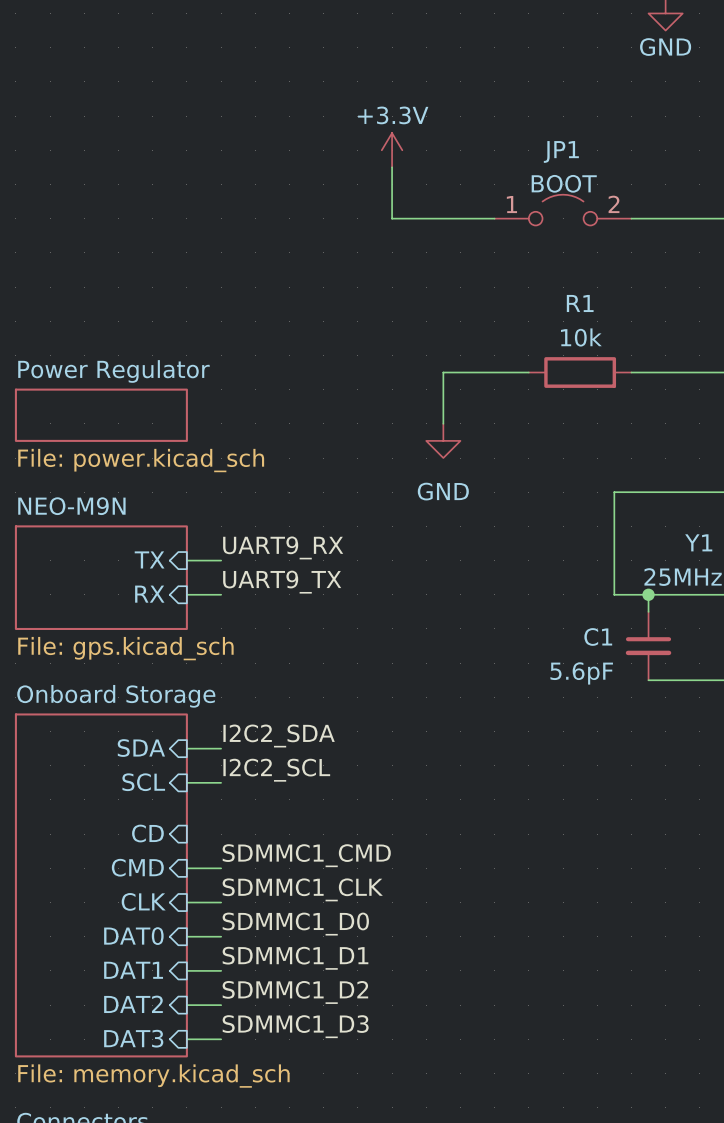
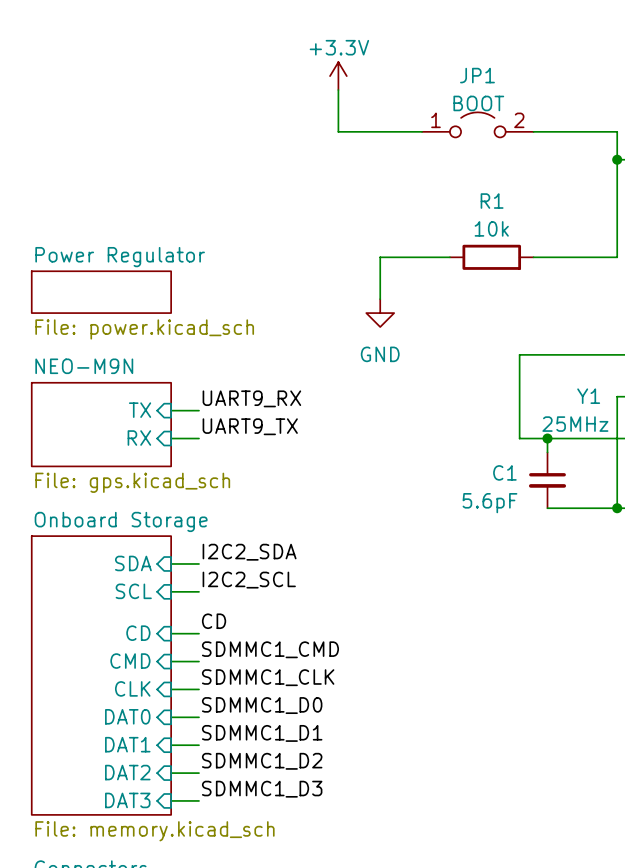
label: none -> CD (214, 621)
wire: none -> (171, 633) (199, 633)

